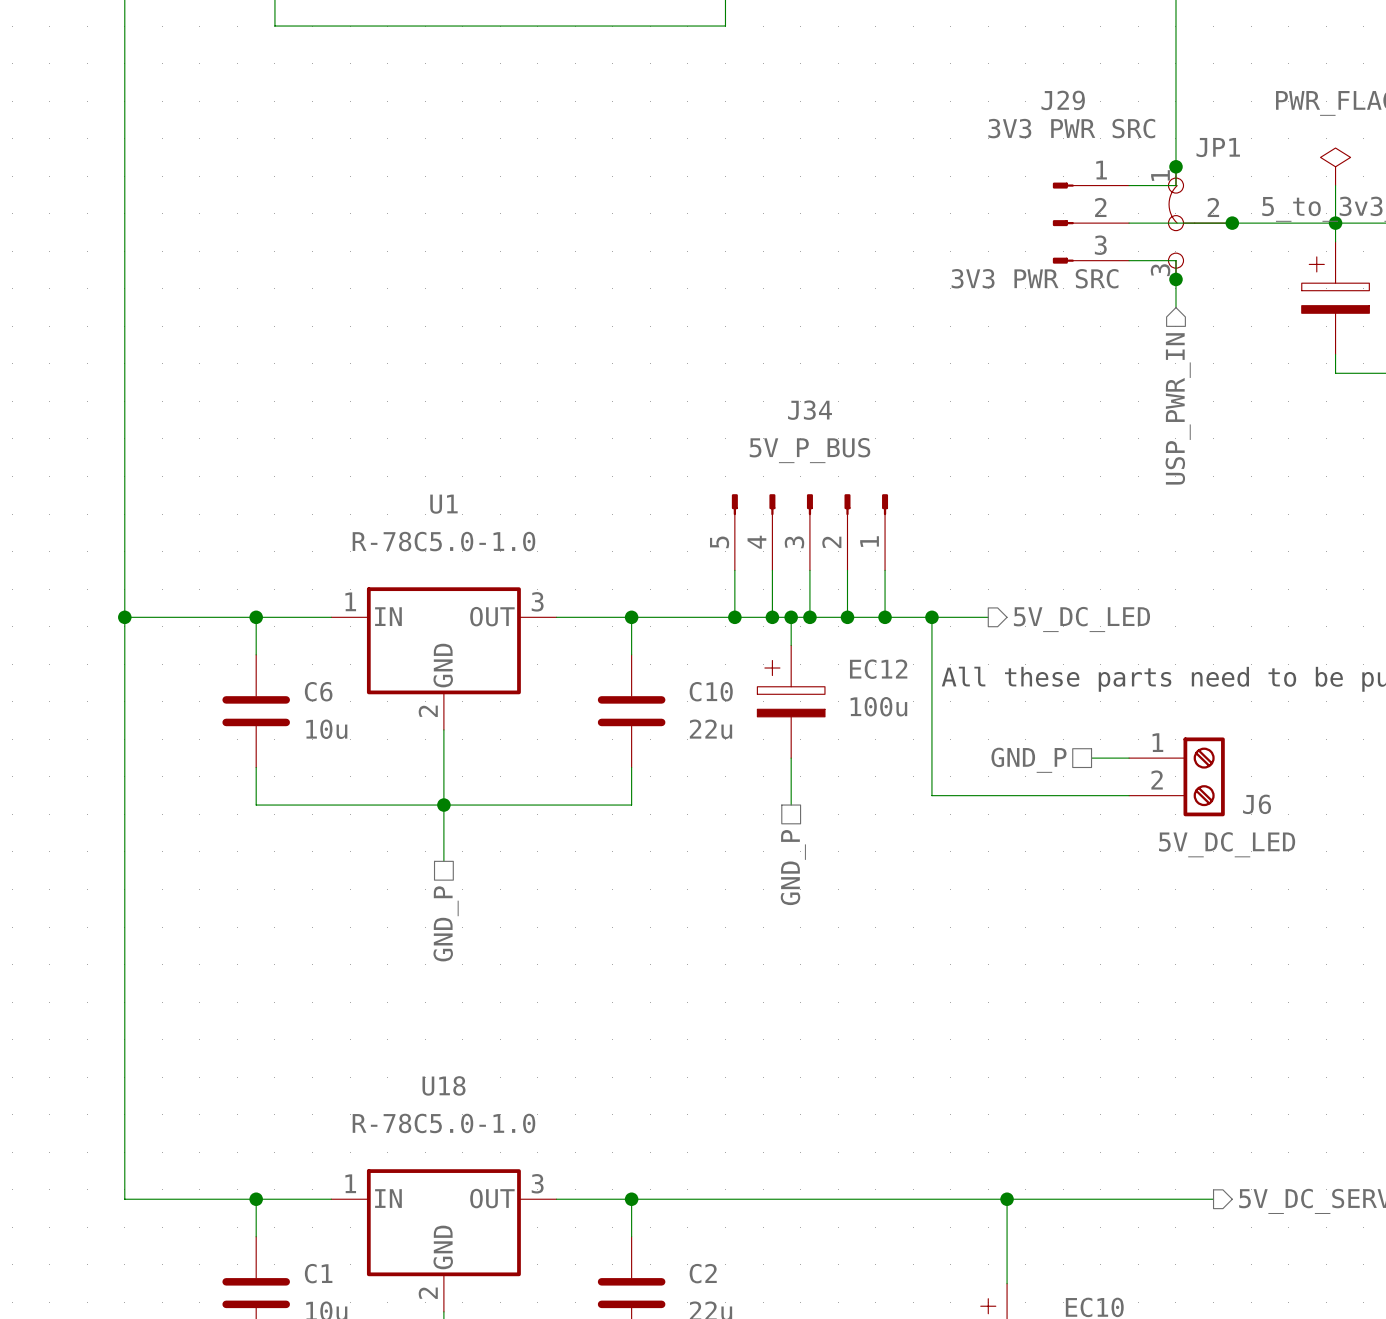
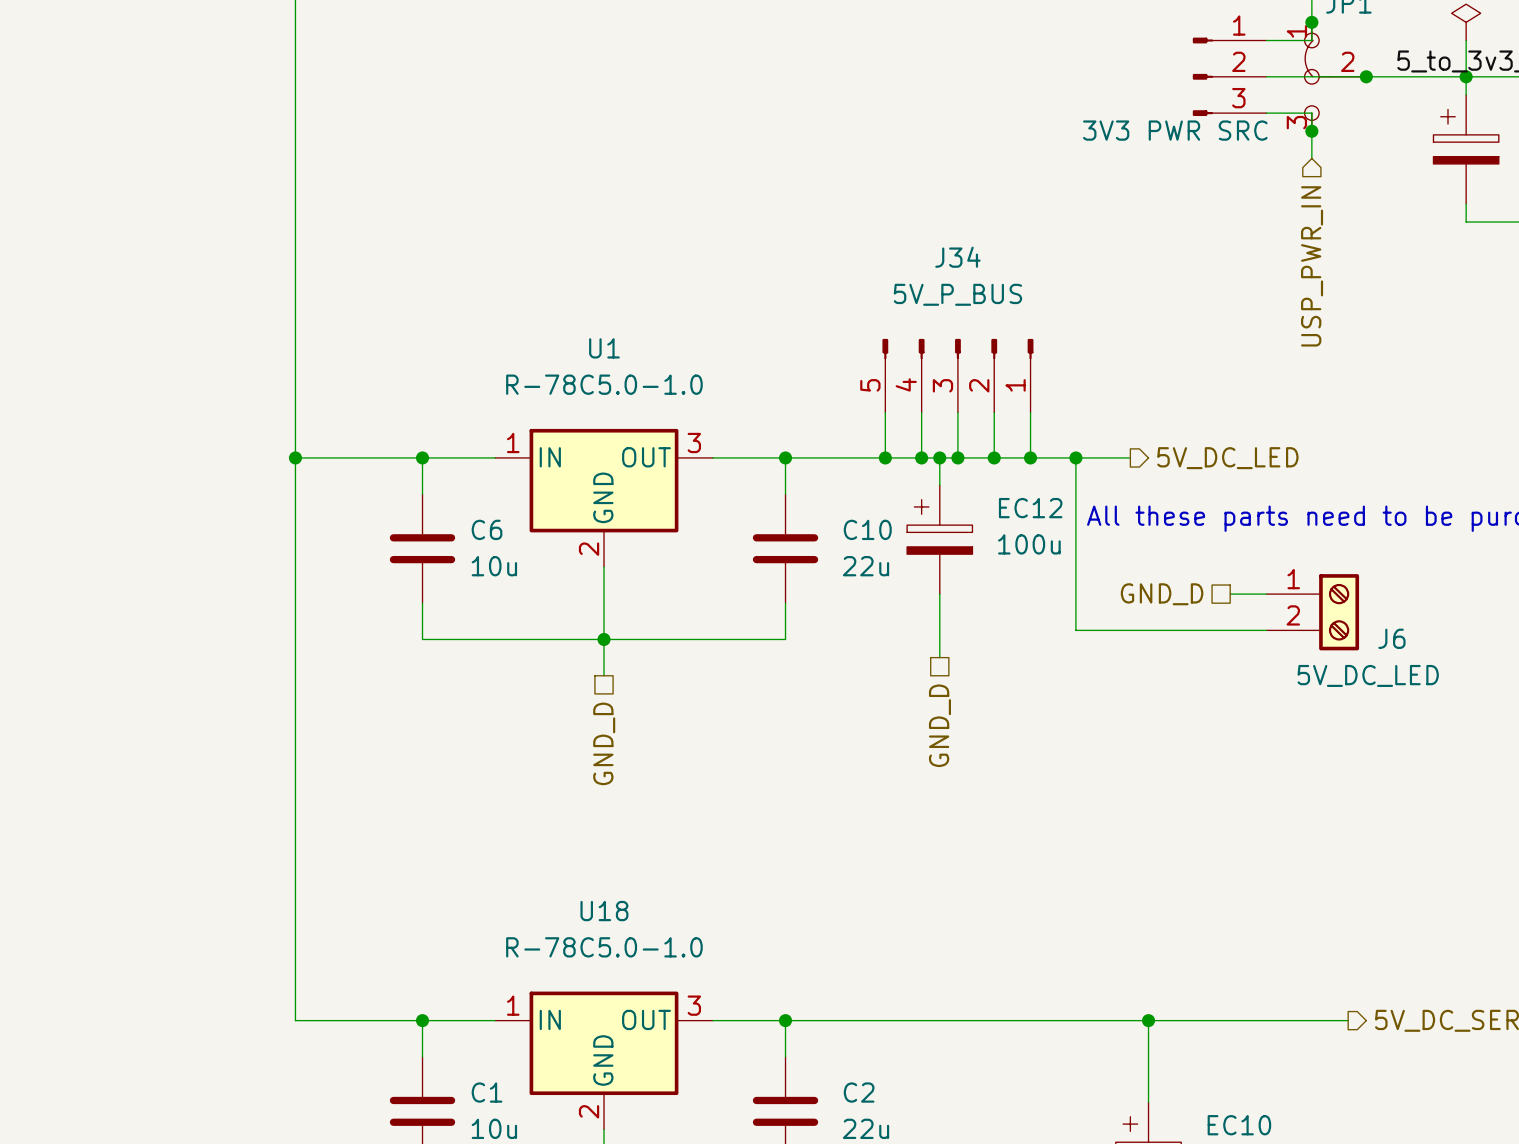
hierarchical label: GND_P (1028, 760) -> GND_D (1162, 594)
wire: (443, 842) (443, 861) -> (939, 639) (939, 657)
hierarchical label: GND_P (793, 867) -> GND_D (939, 725)
hierarchical label: GND_P (446, 923) -> GND_D (604, 743)

